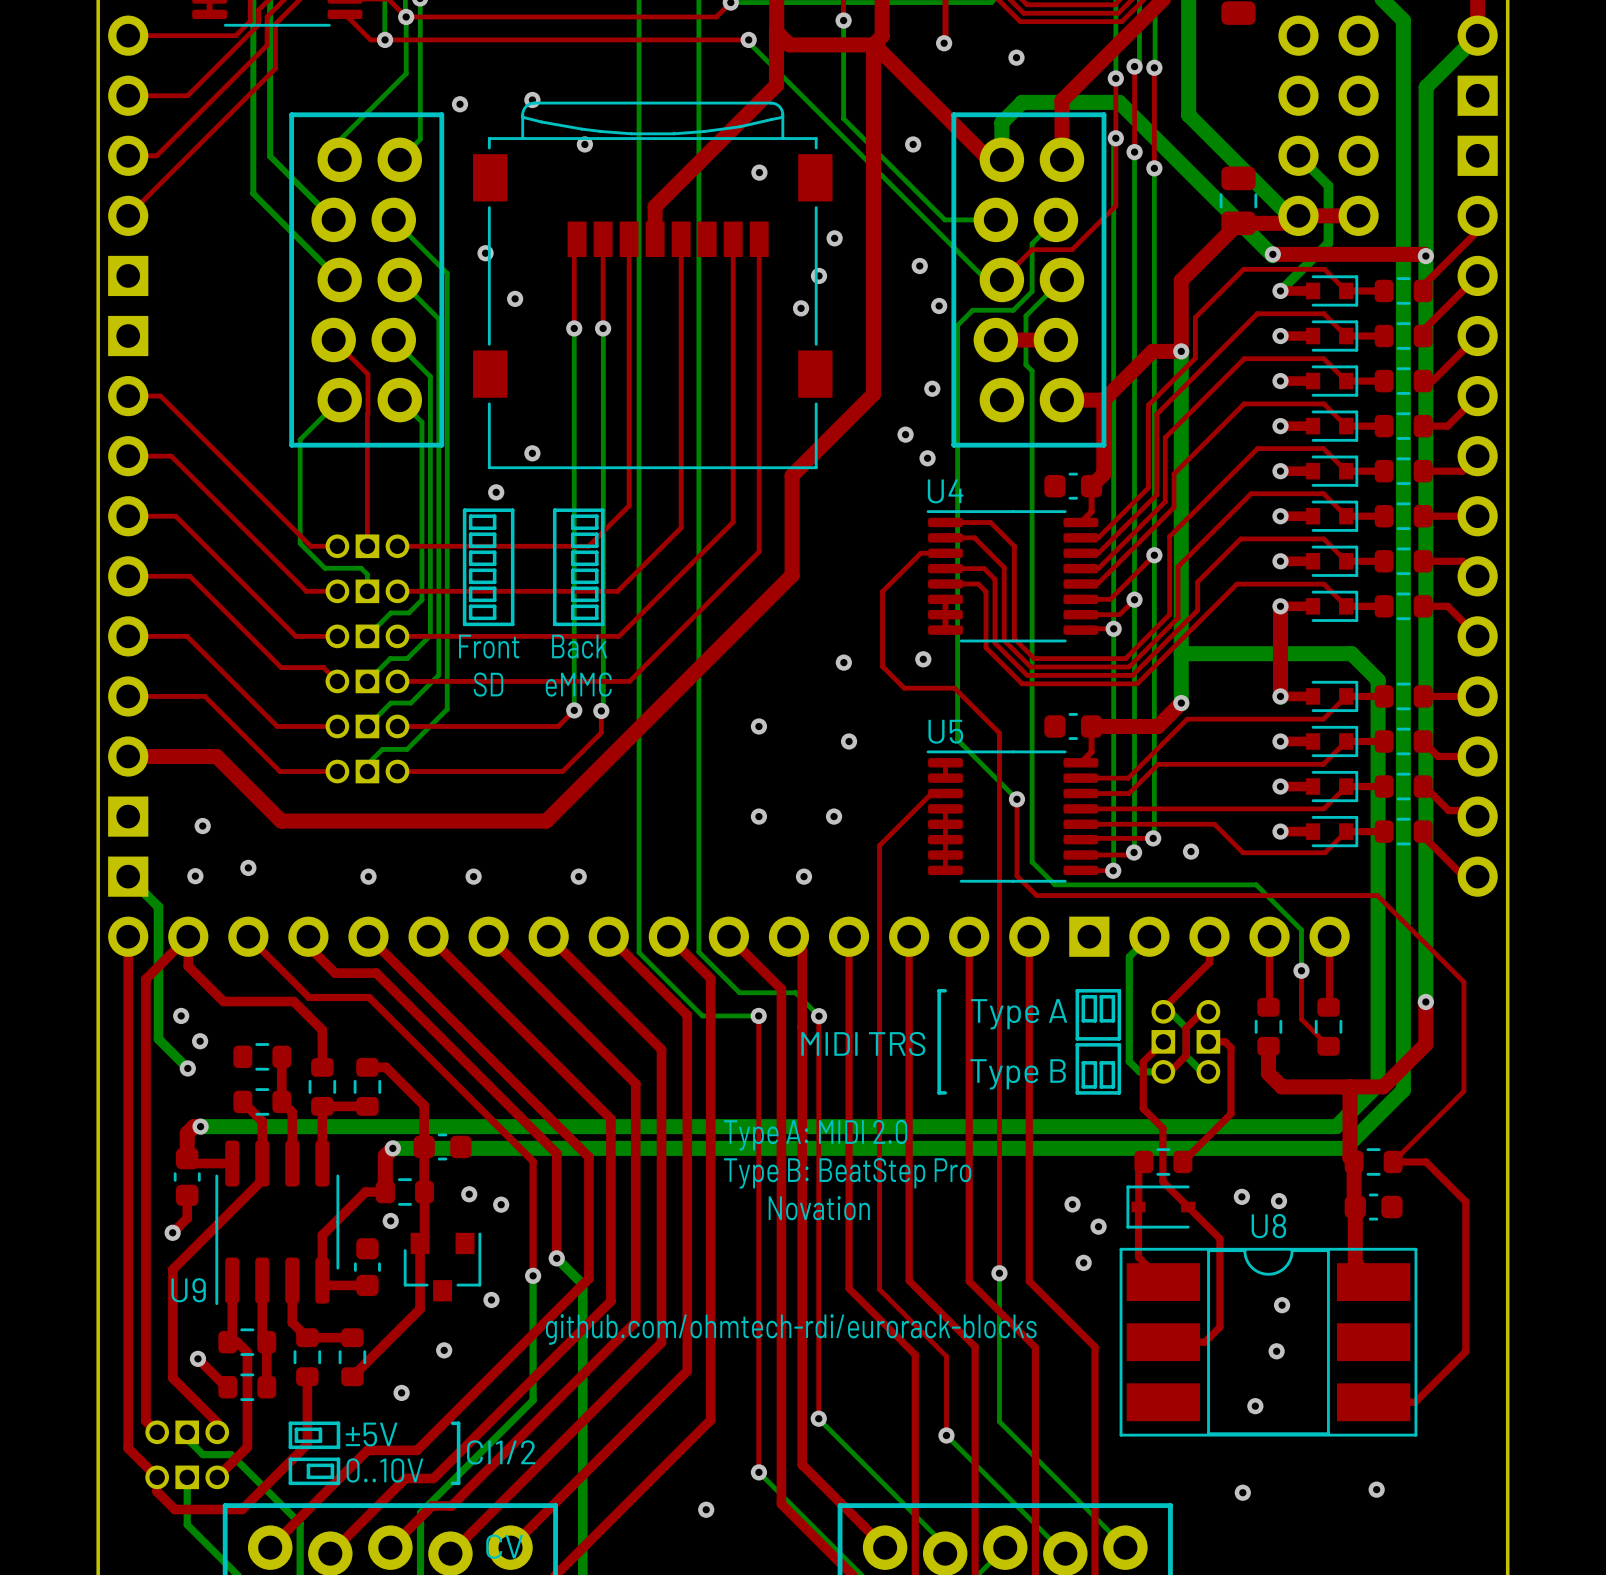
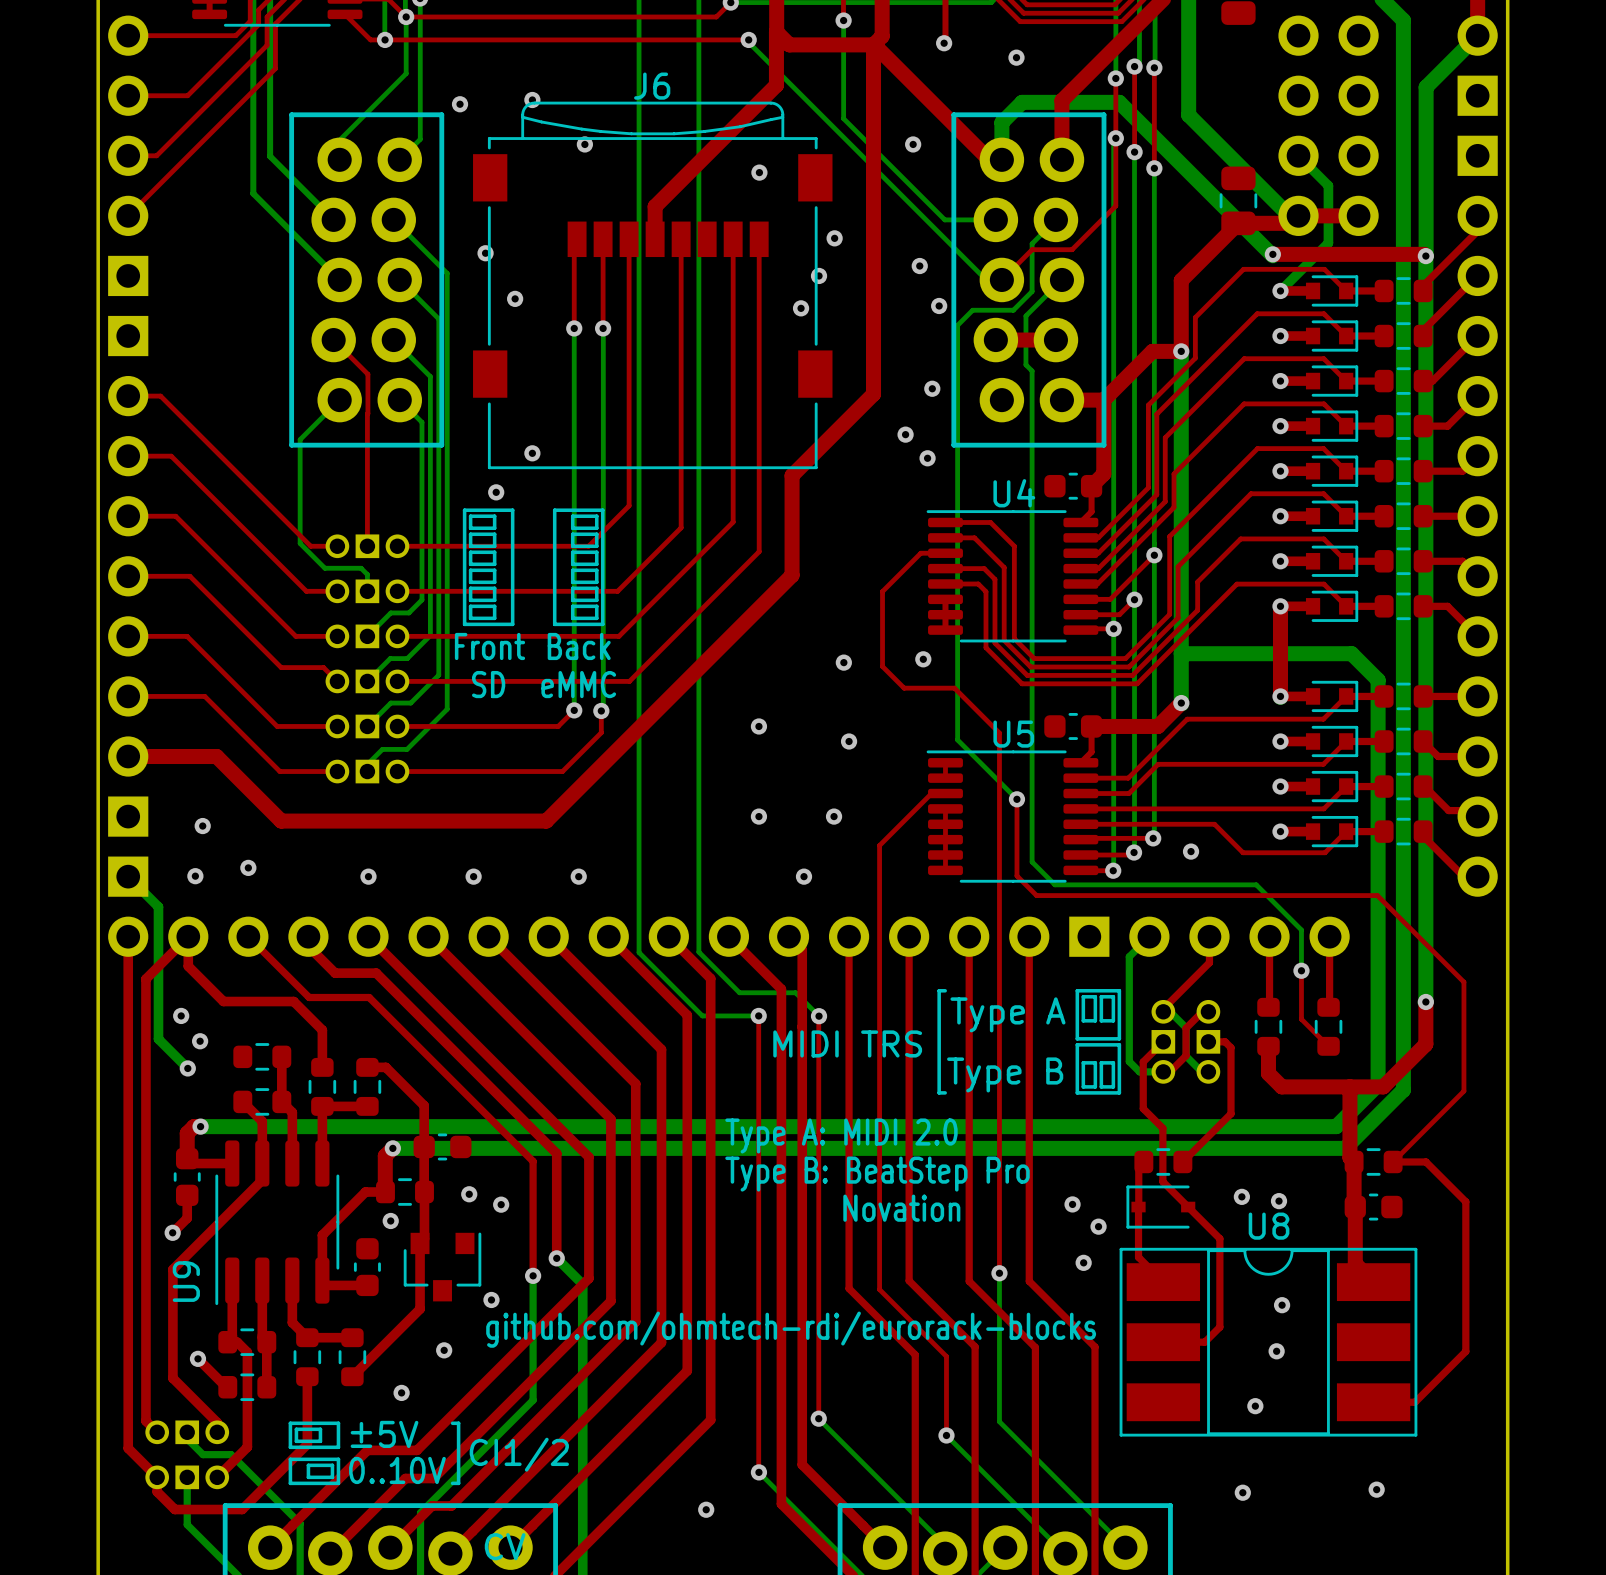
J6 name: none -> J6 (652, 86)
U4 name position: U4 (945, 491) -> U4 (1014, 493)
U5 name position: U5 (945, 731) -> U5 (1013, 734)
U9 name rotation: 0° (188, 1290) -> 90° counterclockwise (186, 1281)

